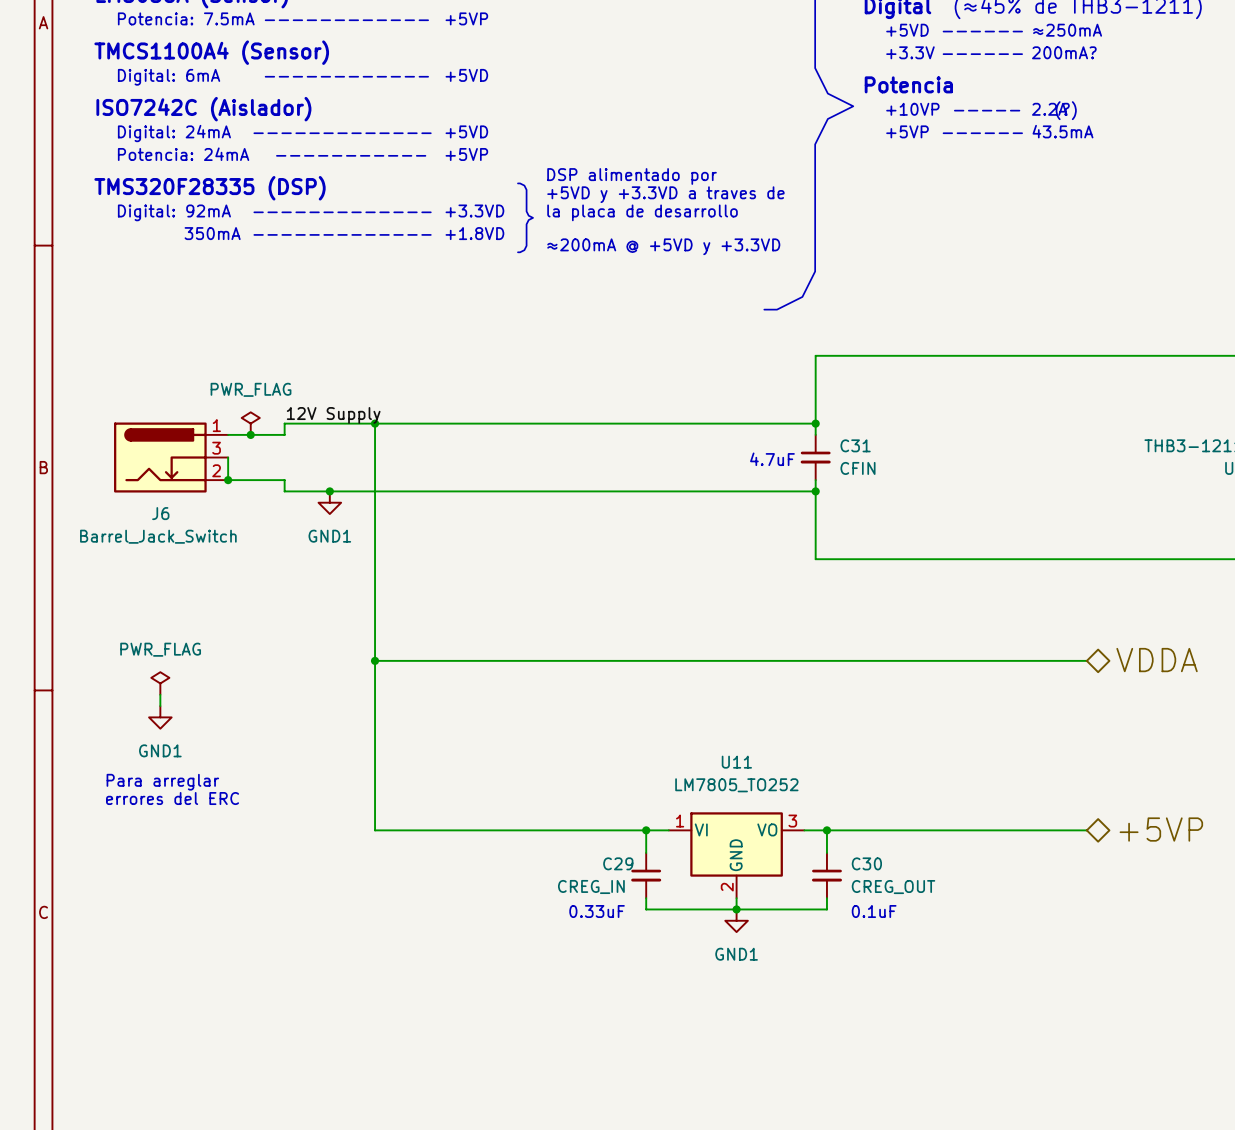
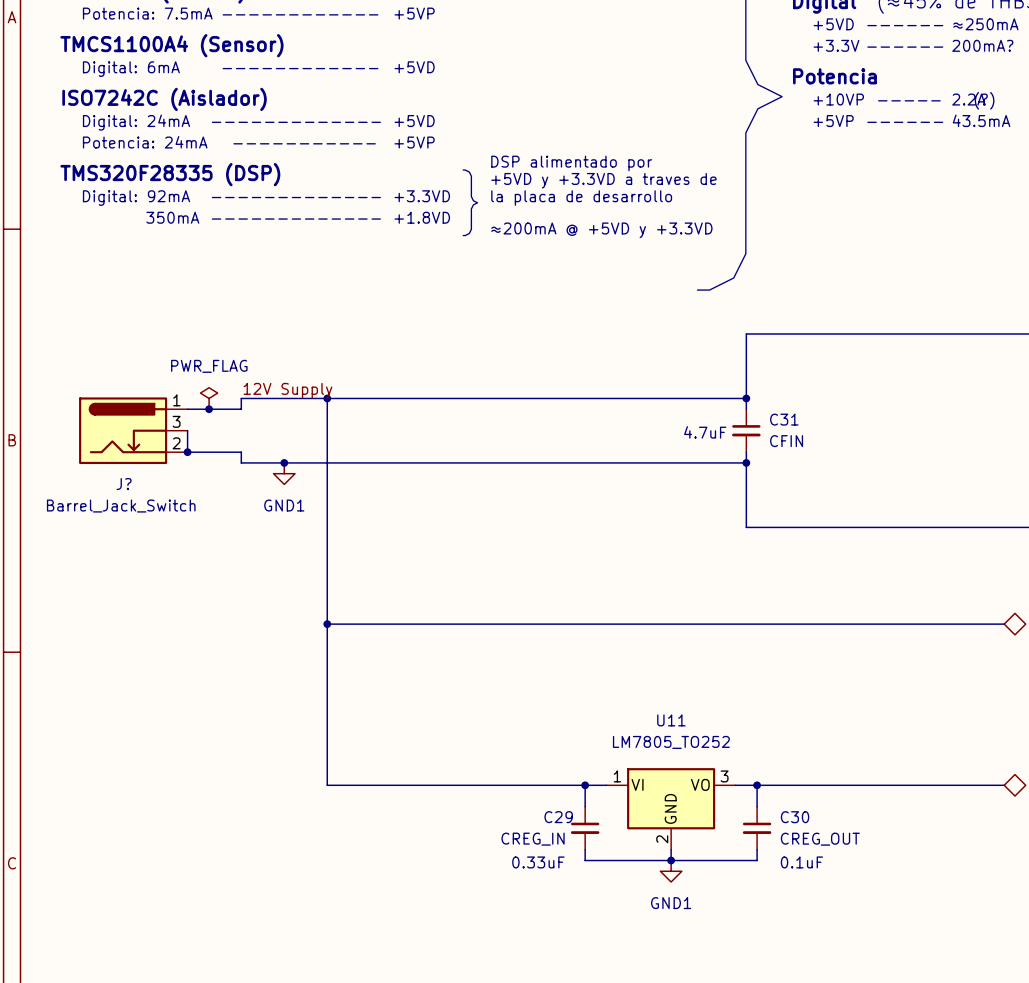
J6 name: J6 (160, 513) -> J? (124, 484)
power symbol: PWR_FLAG (160, 683) -> none
wire: (160, 694) (160, 706) -> none
power symbol: GND1 (160, 717) -> none
text: Para arreglar (162, 782) -> none
text: errores del ERC (172, 798) -> none

